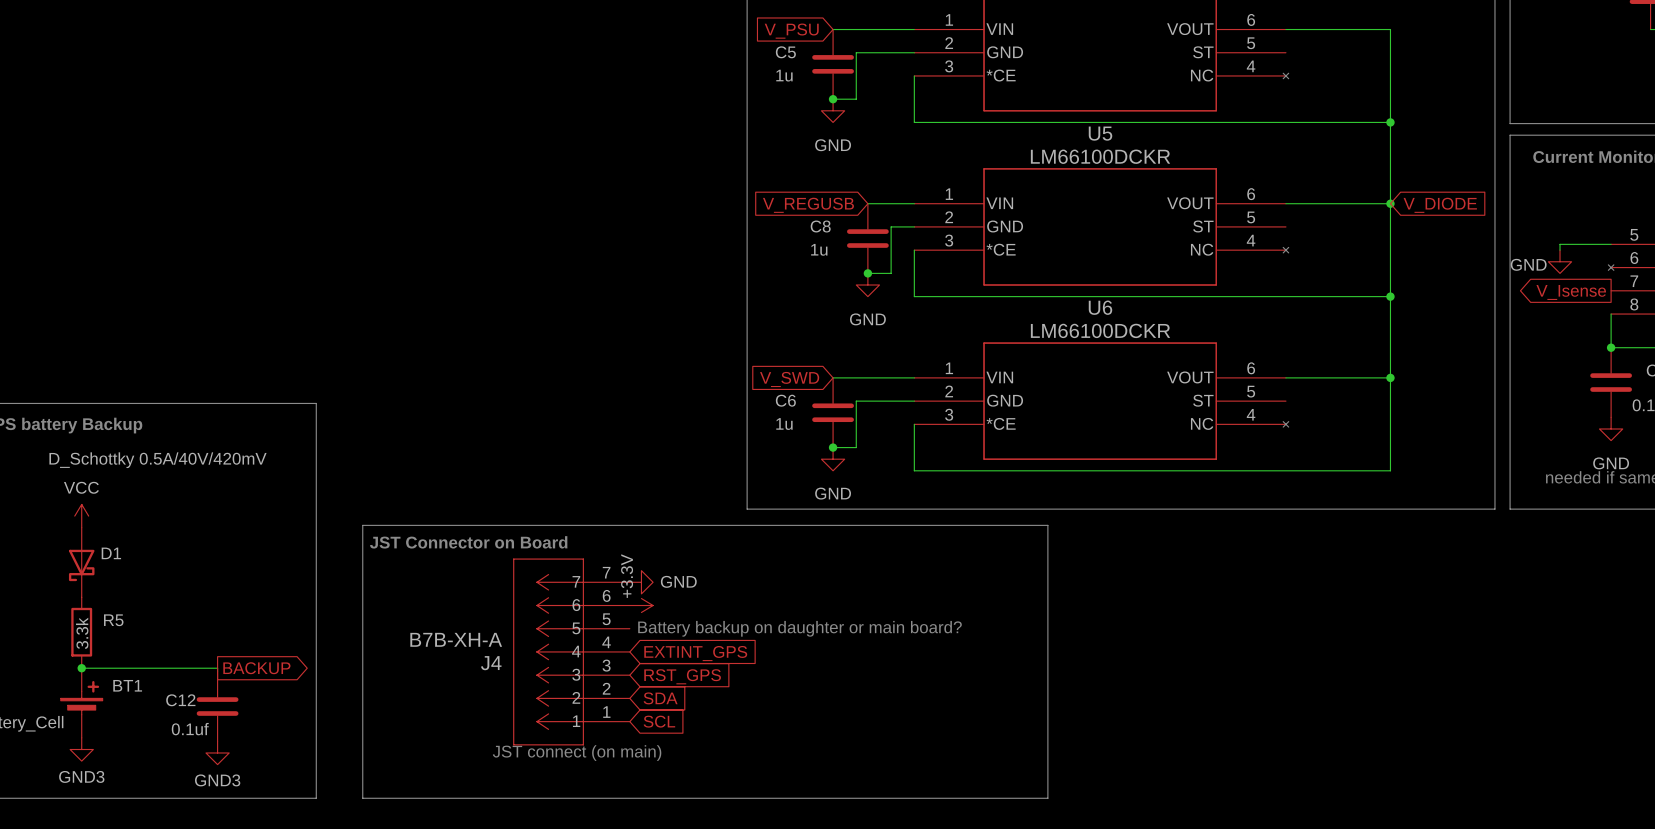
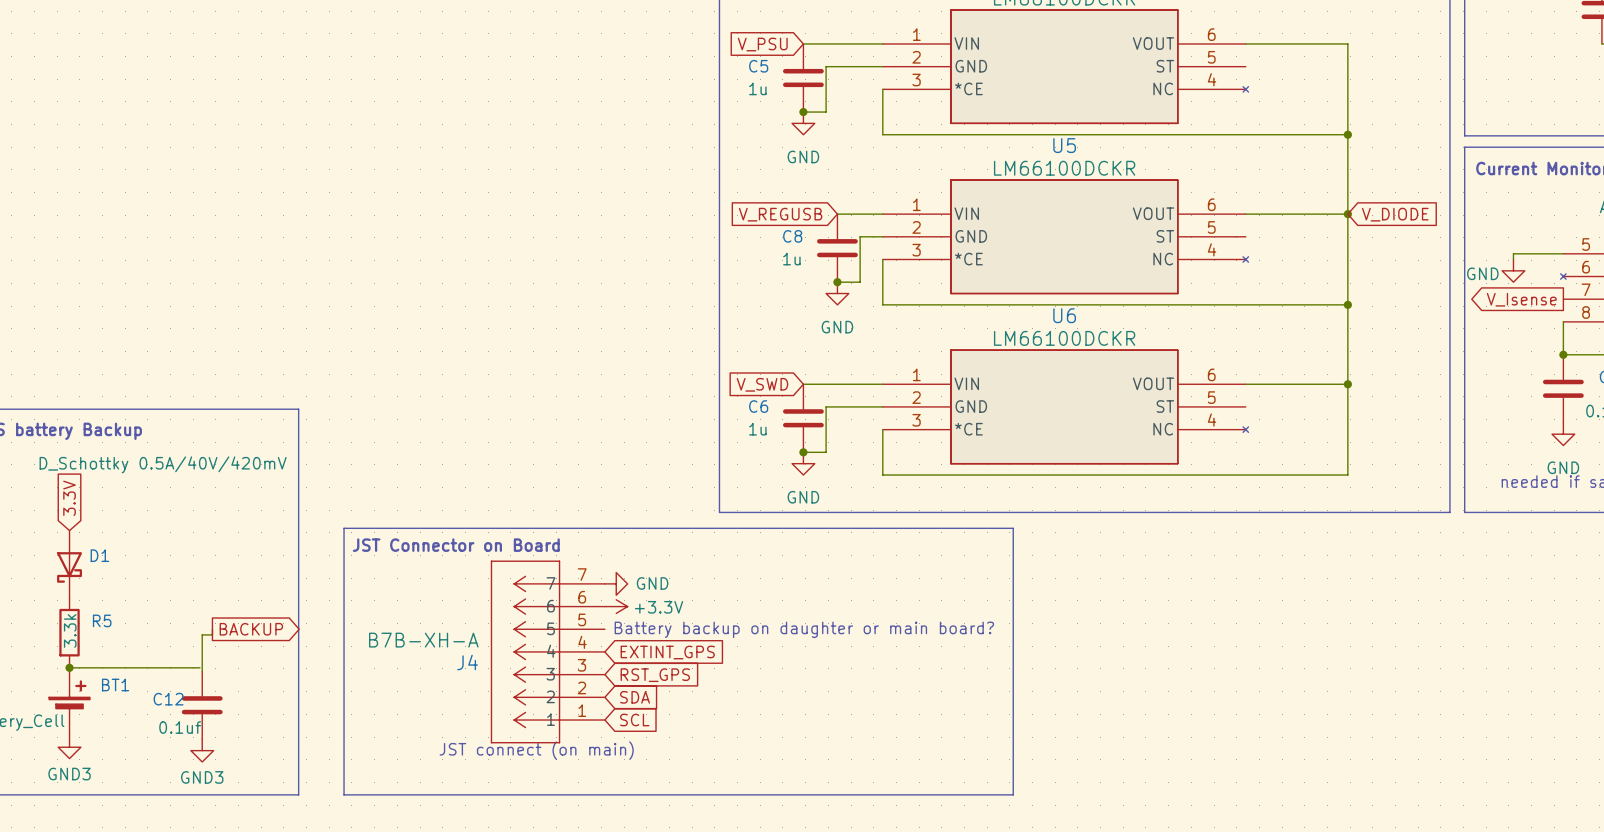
global label: none -> 3.3V (69, 498)
power symbol: VCC (81, 516) -> none
power symbol text rotation: 0° (627, 576) -> 90° clockwise (659, 607)
wire: (215, 668) (217, 668) -> (212, 629) (212, 634) (202, 634) (202, 667)
global label position: BACKUP (256, 668) -> BACKUP (251, 629)

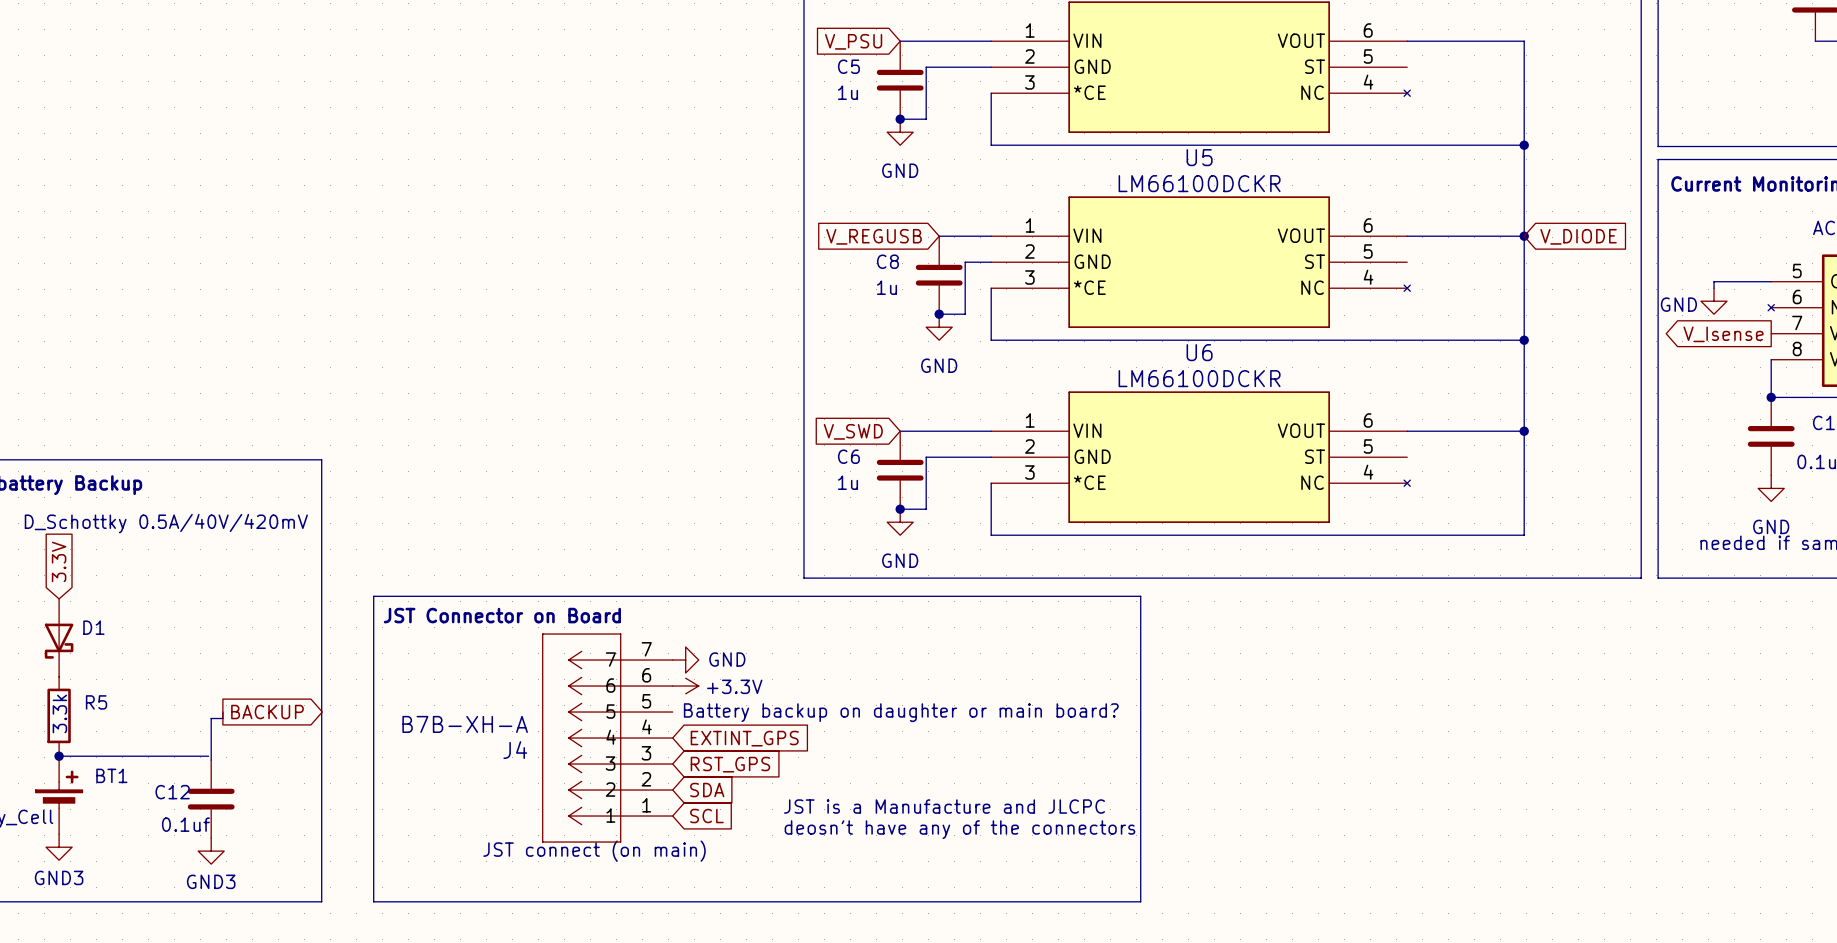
text: none -> JST is a Manufacture and JLCPC (944, 806)
text: none -> deosn't have any of the connectors (959, 829)

